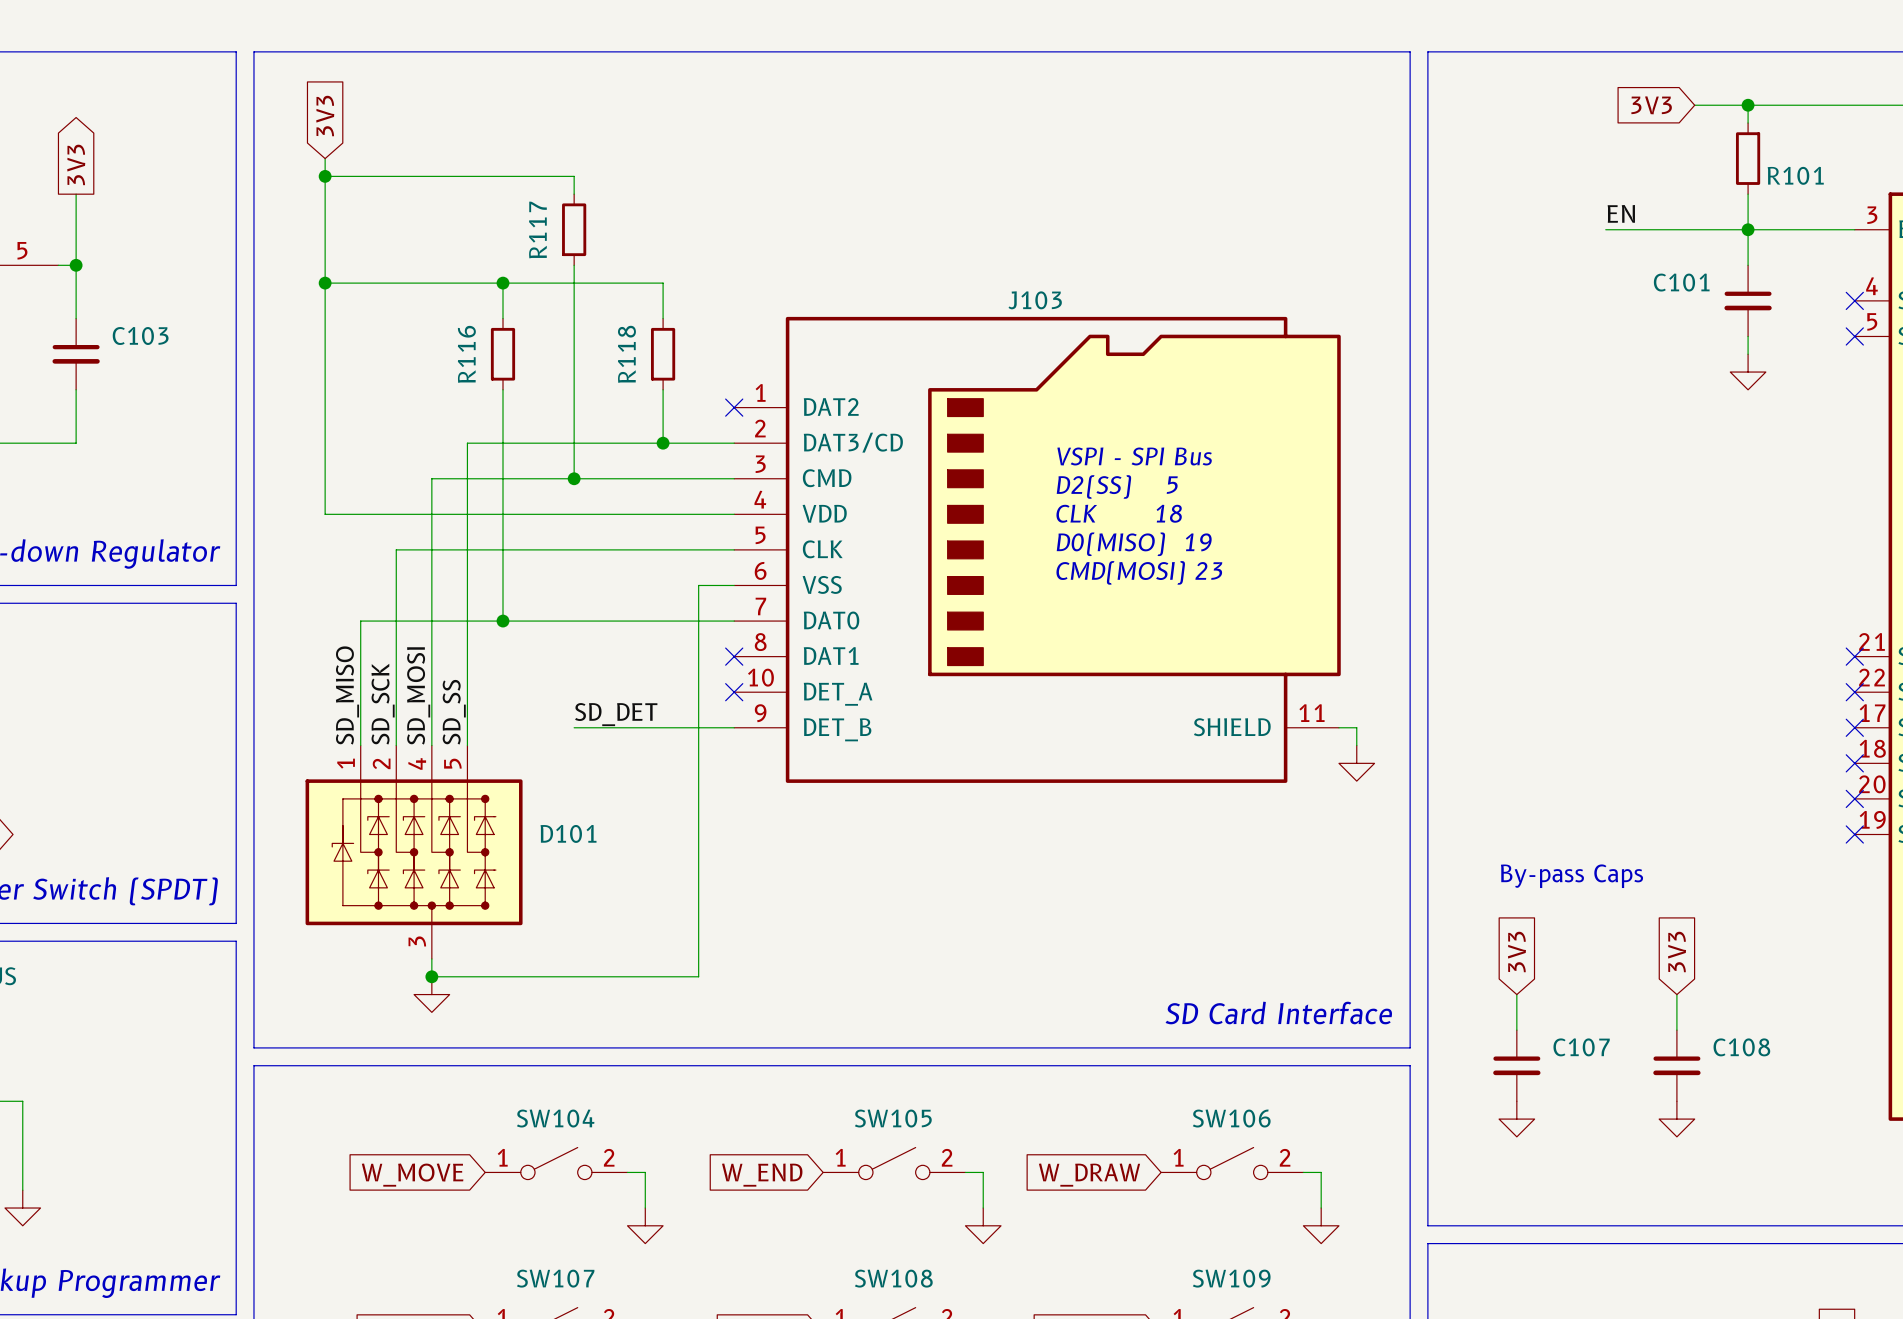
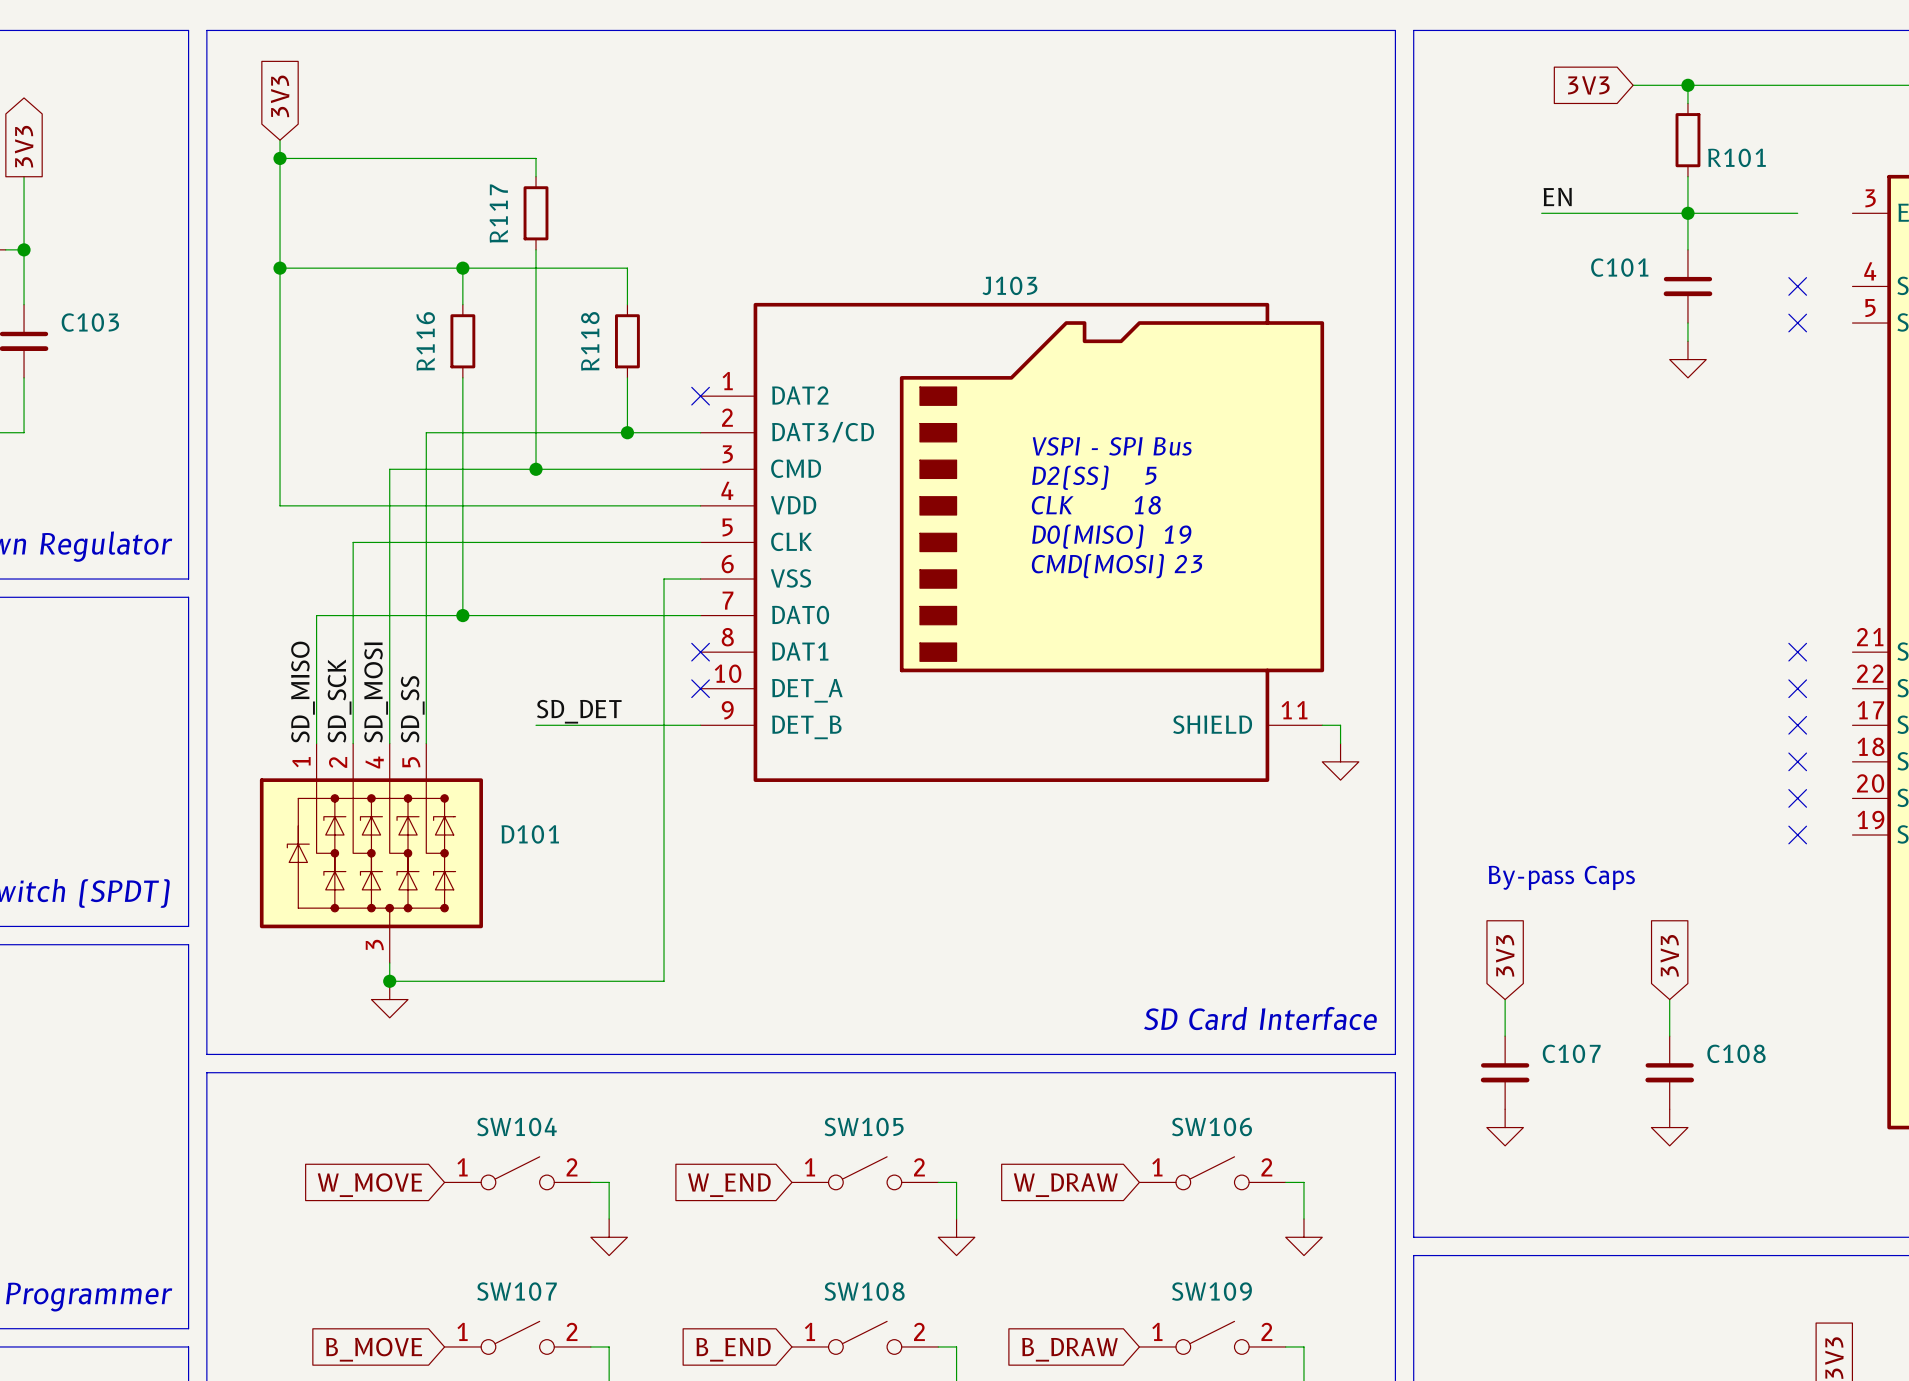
wire: none -> (1633, 85) (1687, 85) (1687, 103)
global label position: 3V3 (1651, 105) -> 3V3 (1588, 85)
wire: (1748, 105) (1748, 123) -> none
junction position: (1748, 105) -> (1687, 85)
R101 position: (1748, 158) -> (1687, 140)
wire: (1748, 194) (1748, 265) -> (1687, 176) (1687, 249)
label position: EN (1621, 213) -> EN (1557, 196)
junction position: (1748, 229) -> (1687, 213)
wire: (1801, 229) (1854, 229) -> (1541, 213) (1596, 213)
C101 position: (1748, 300) -> (1687, 286)
no-connect mark: none -> (1797, 286)
no-connect mark: (1854, 300) -> none
wire: (1748, 336) (1748, 354) -> (1687, 323) (1687, 341)
no-connect mark: none -> (1797, 323)
no-connect mark: (1854, 336) -> none
power symbol position: (1748, 372) -> (1687, 359)
no-connect mark: none -> (1797, 652)
no-connect mark: (1854, 656) -> none
no-connect mark: none -> (1797, 688)
no-connect mark: (1854, 692) -> none
no-connect mark: none -> (1797, 725)
no-connect mark: (1854, 727) -> none
no-connect mark: none -> (1797, 761)
no-connect mark: (1854, 763) -> none
no-connect mark: none -> (1797, 798)
no-connect mark: (1854, 798) -> none
no-connect mark: none -> (1797, 835)
no-connect mark: (1854, 834) -> none

